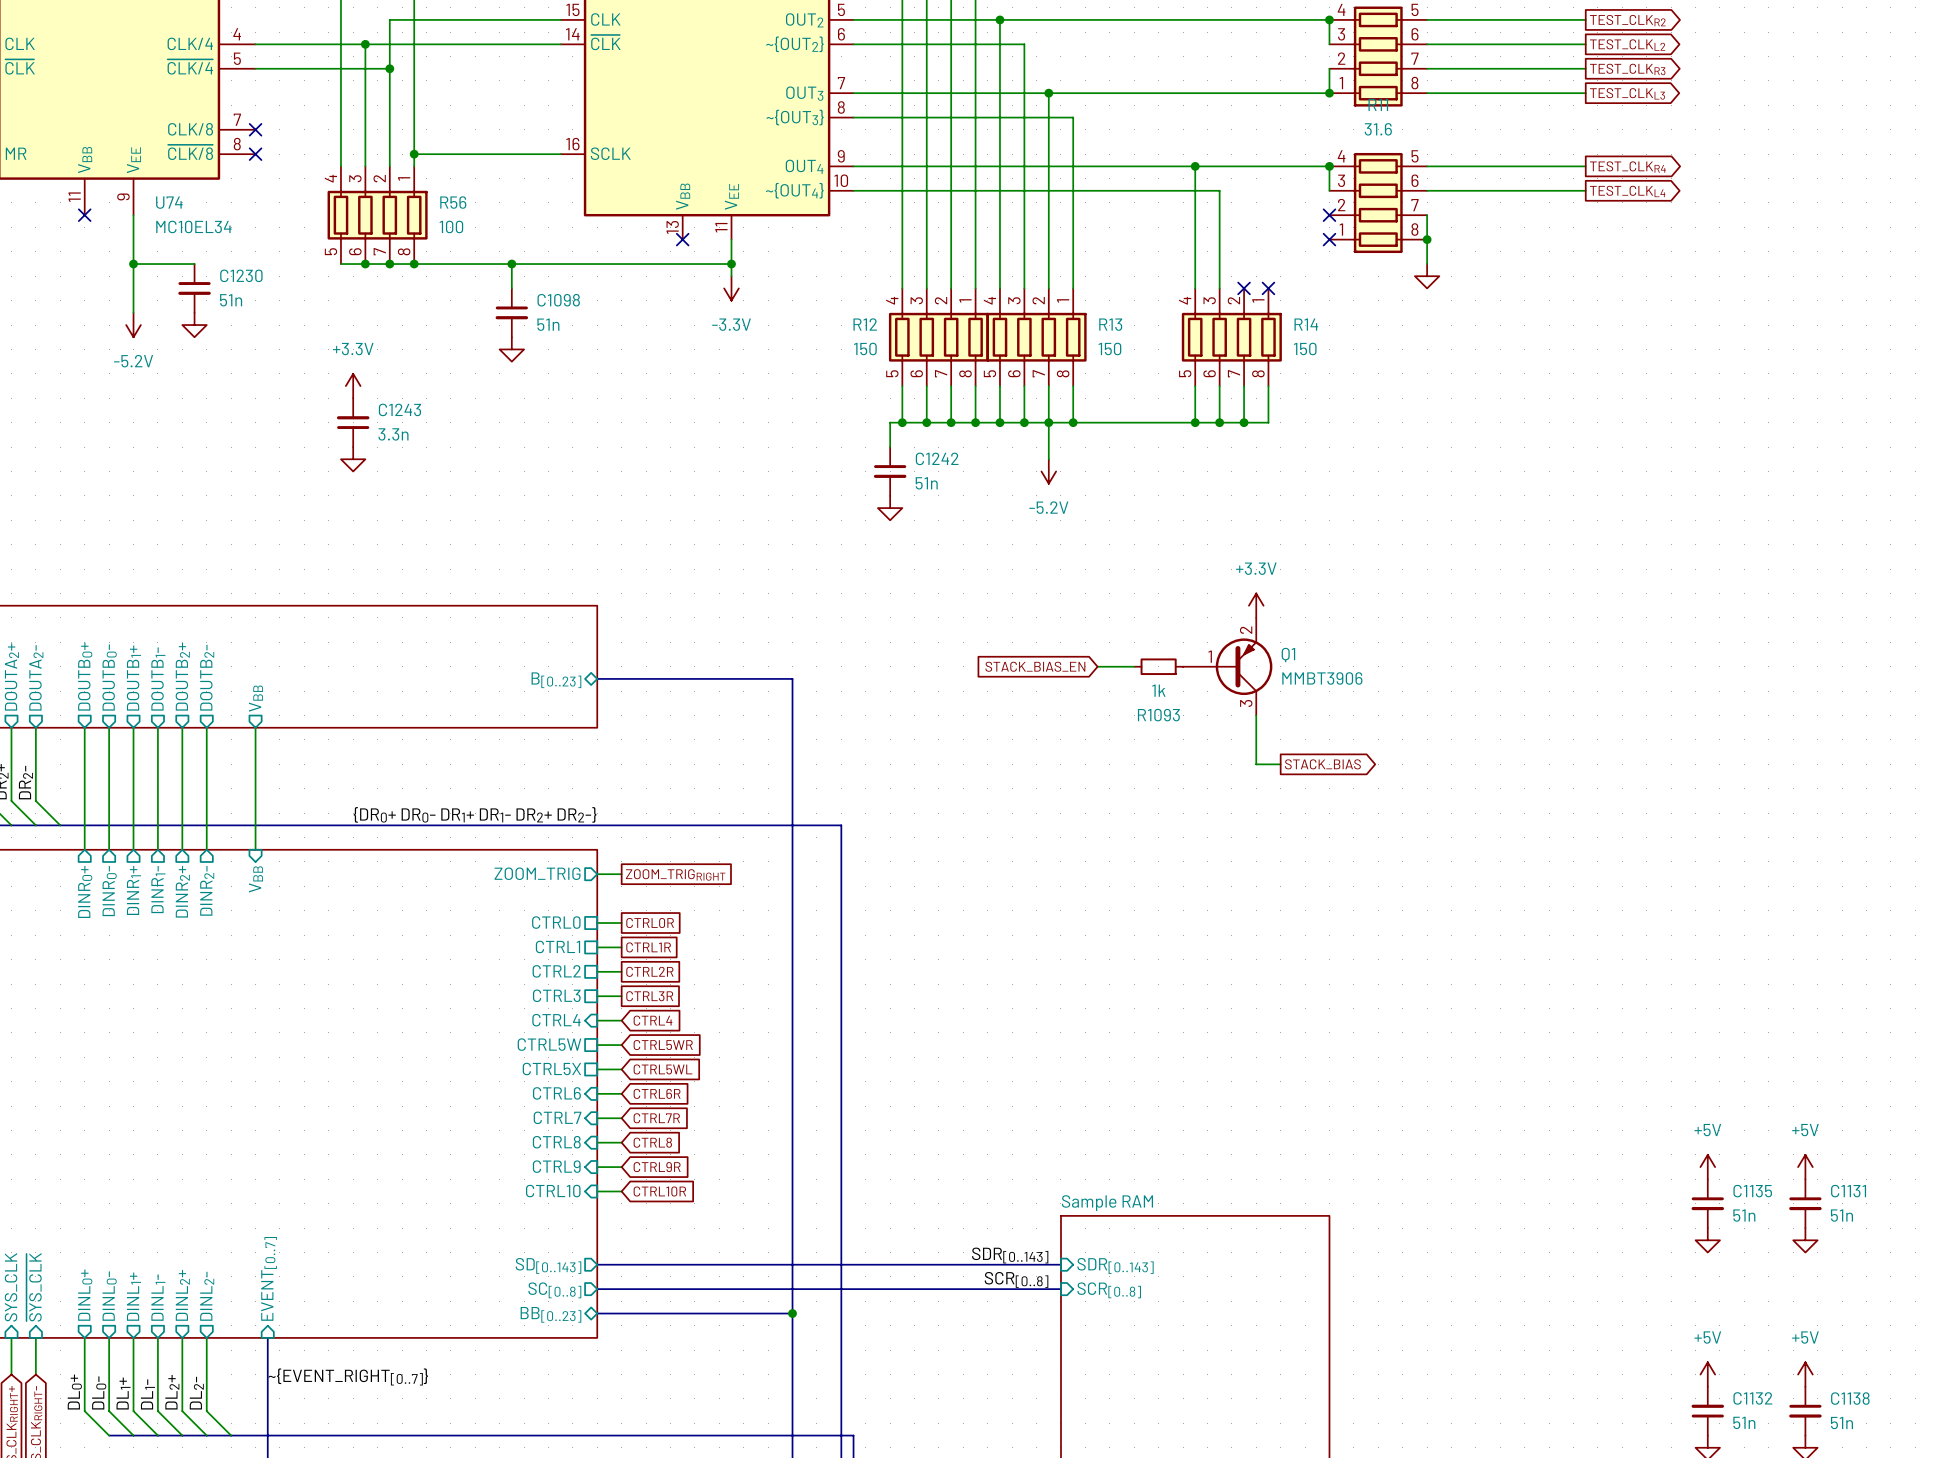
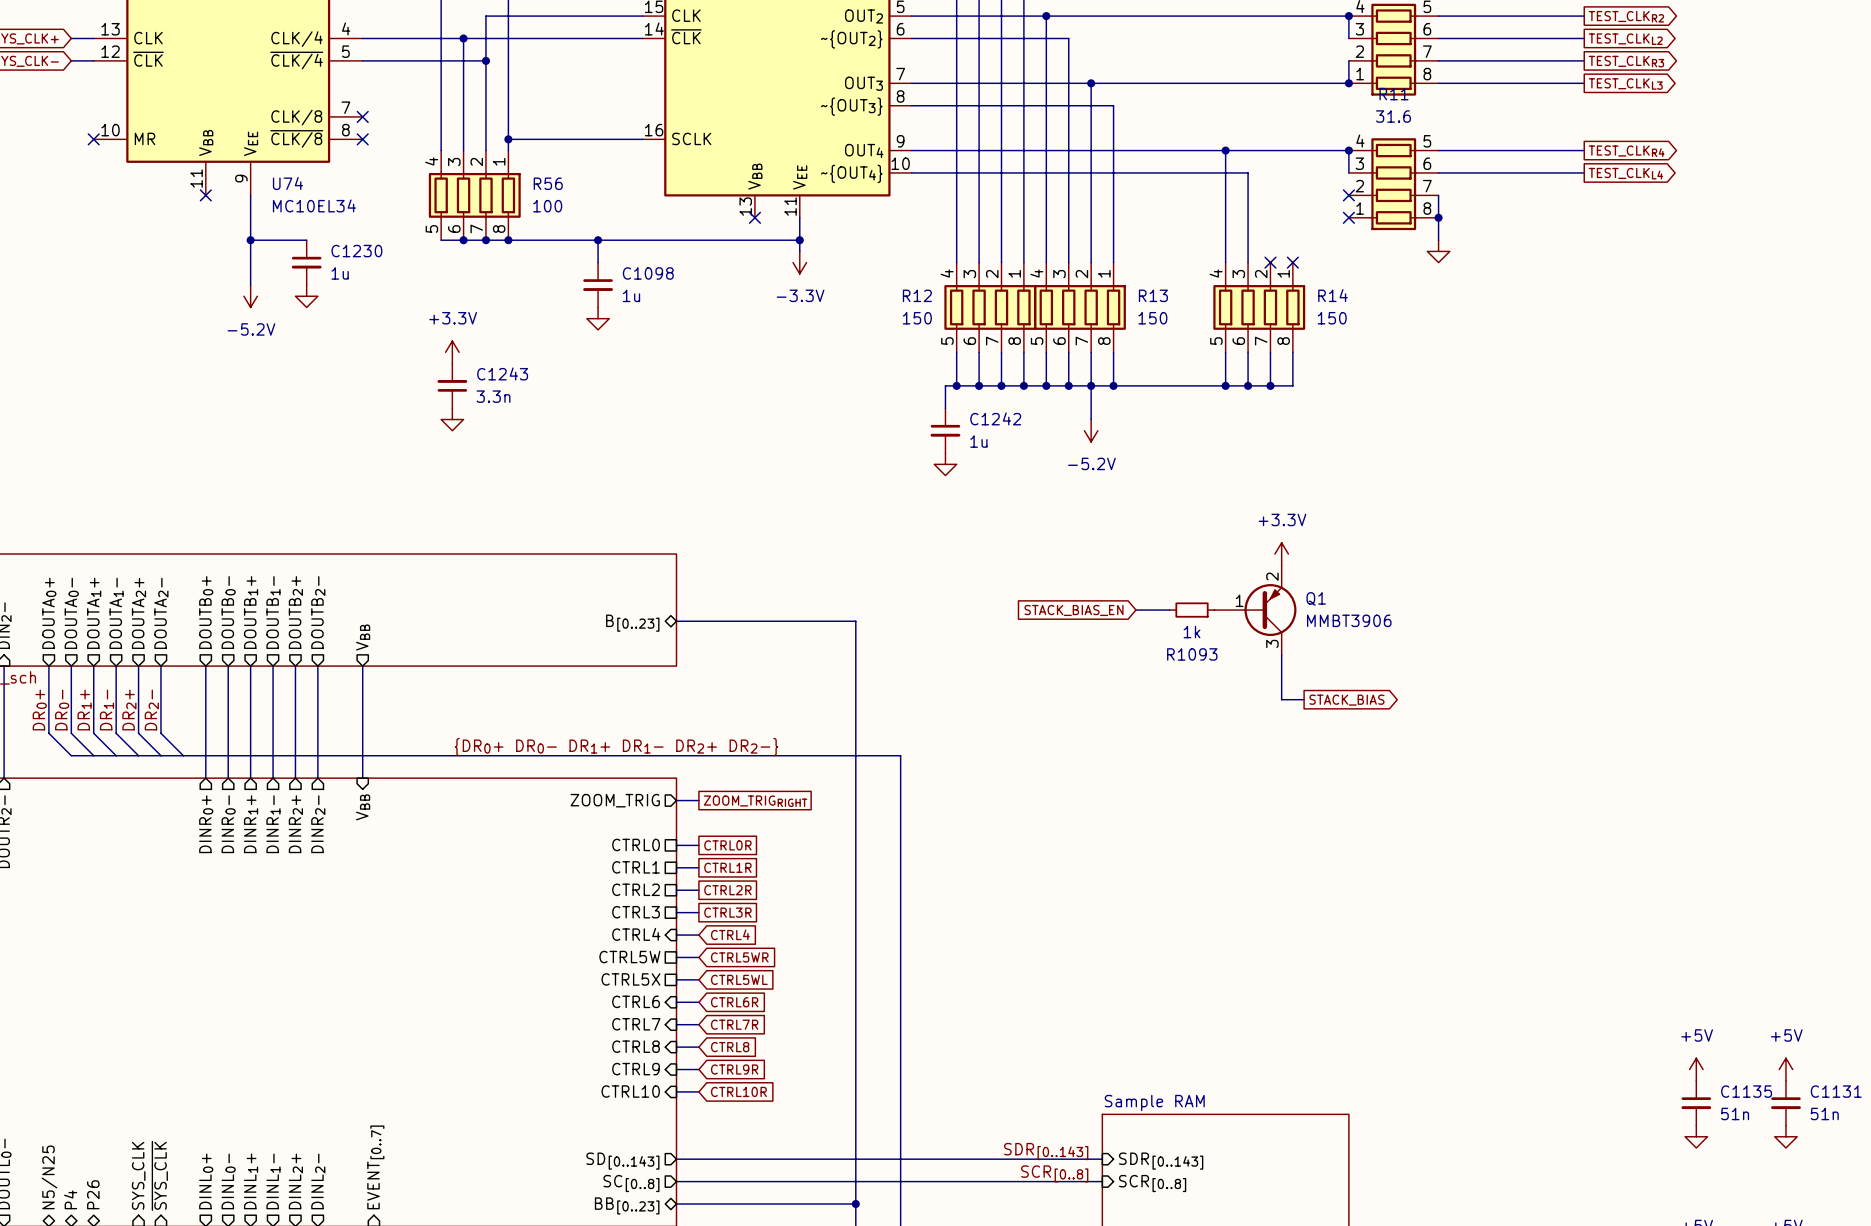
C1230 value: 51n (231, 300) -> 1u (340, 273)
C1098 value: 51n (548, 324) -> 1u (631, 295)
C1242 value: 51n (926, 483) -> 1u (978, 441)

